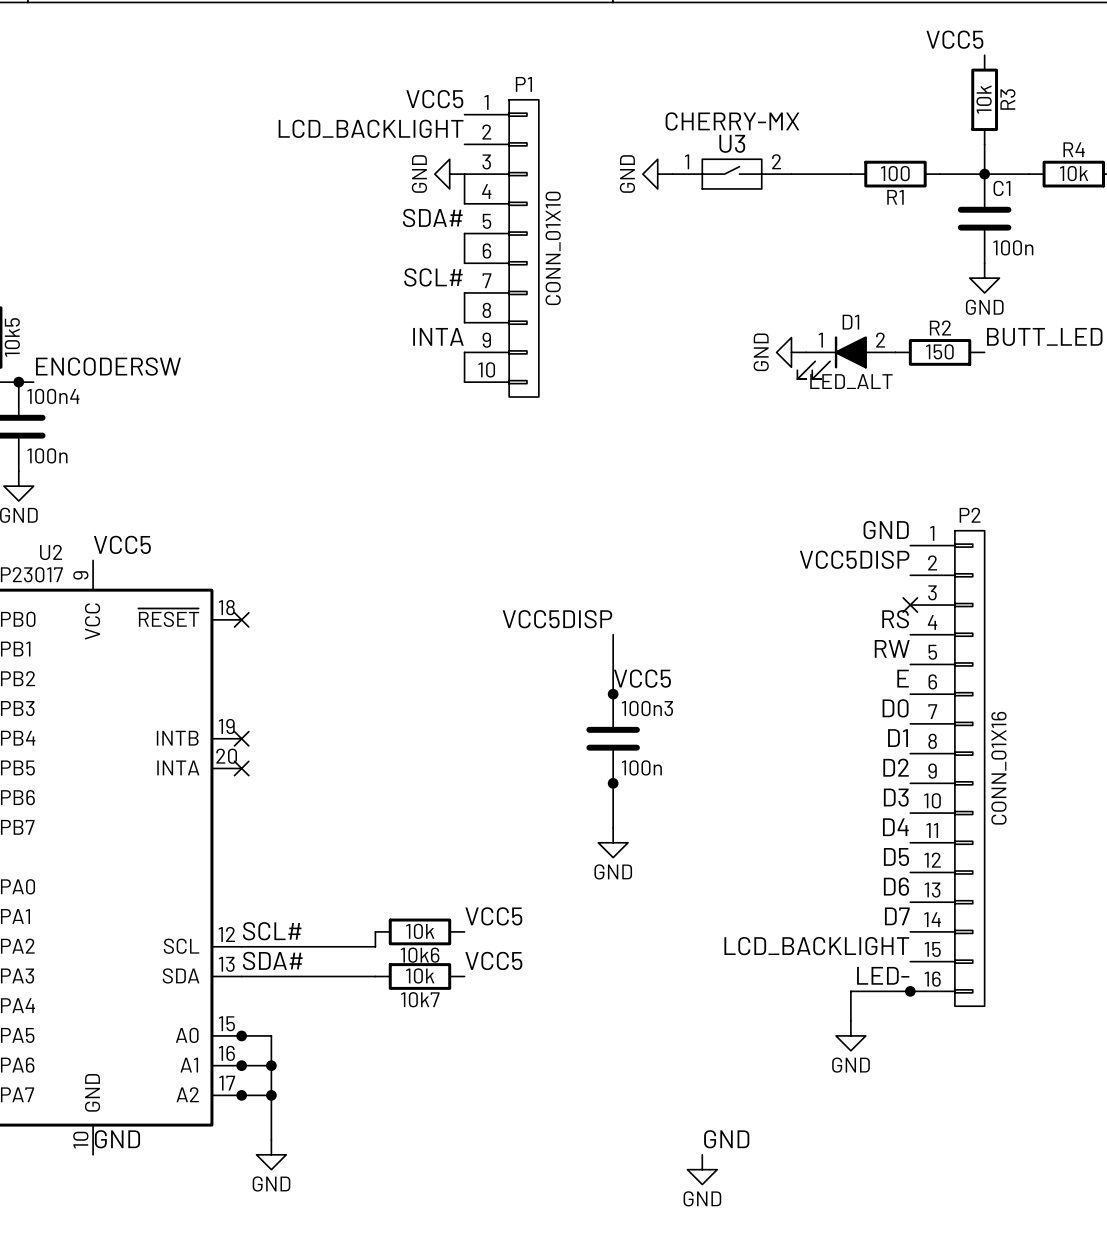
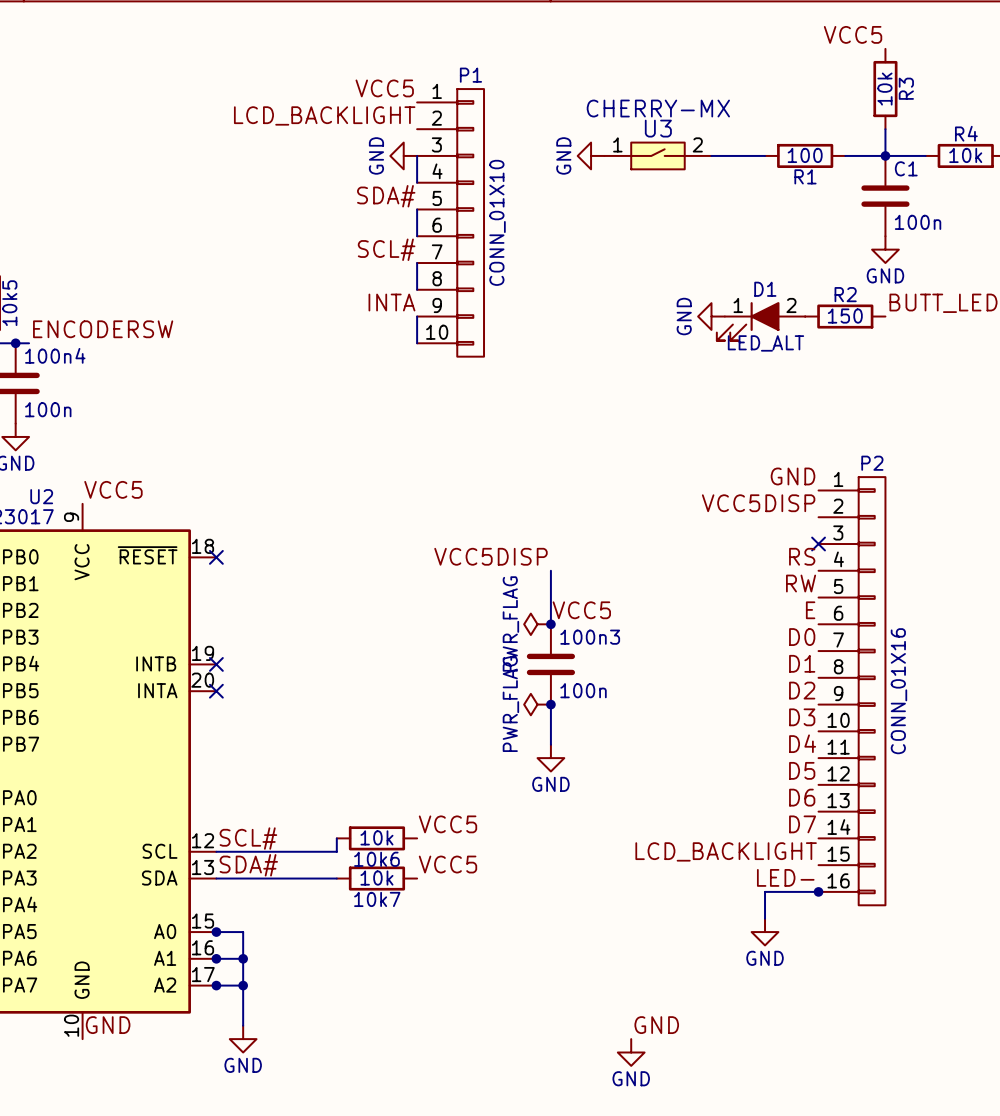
power symbol: none -> PWR_FLAG (537, 624)
power symbol: none -> PWR_FLAG (537, 704)

